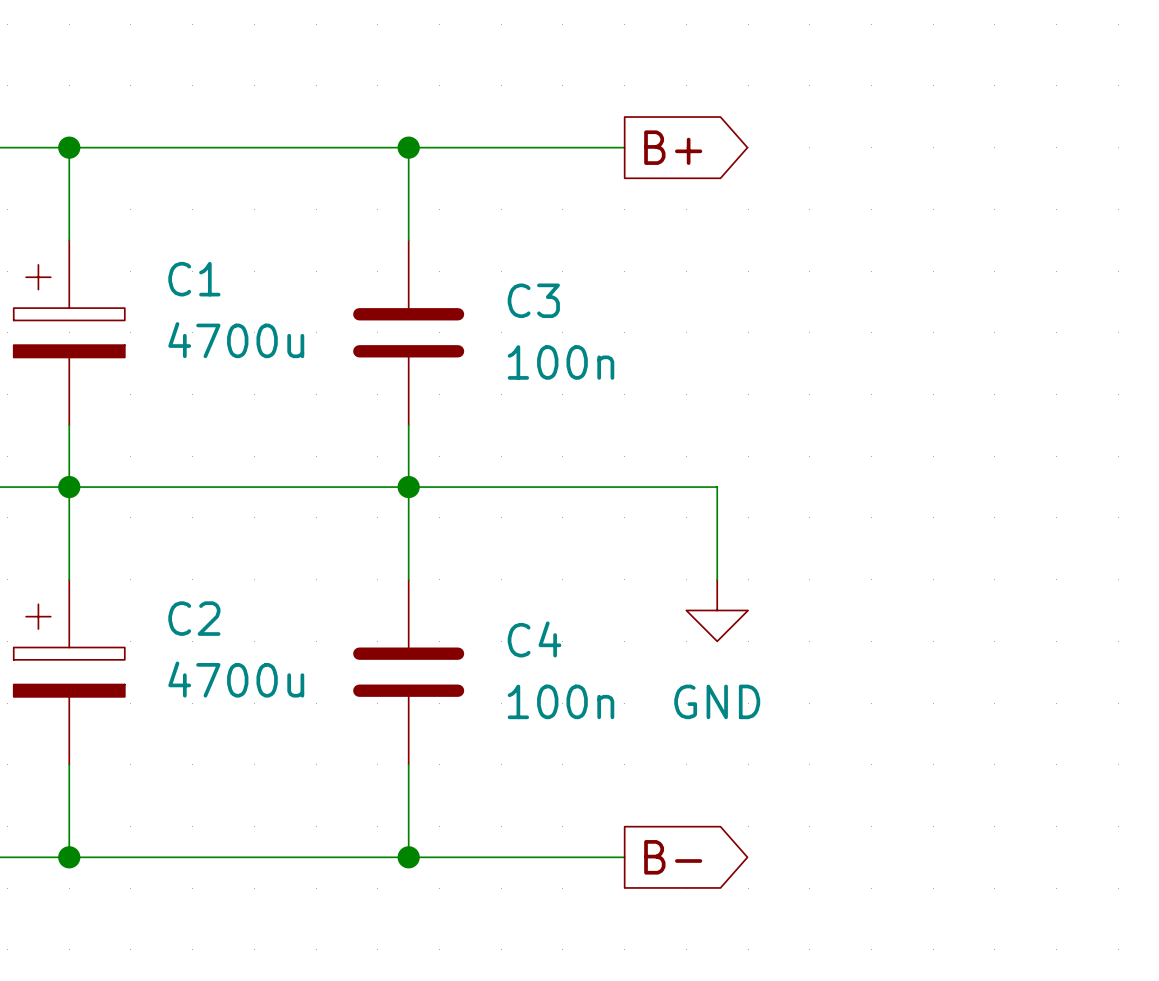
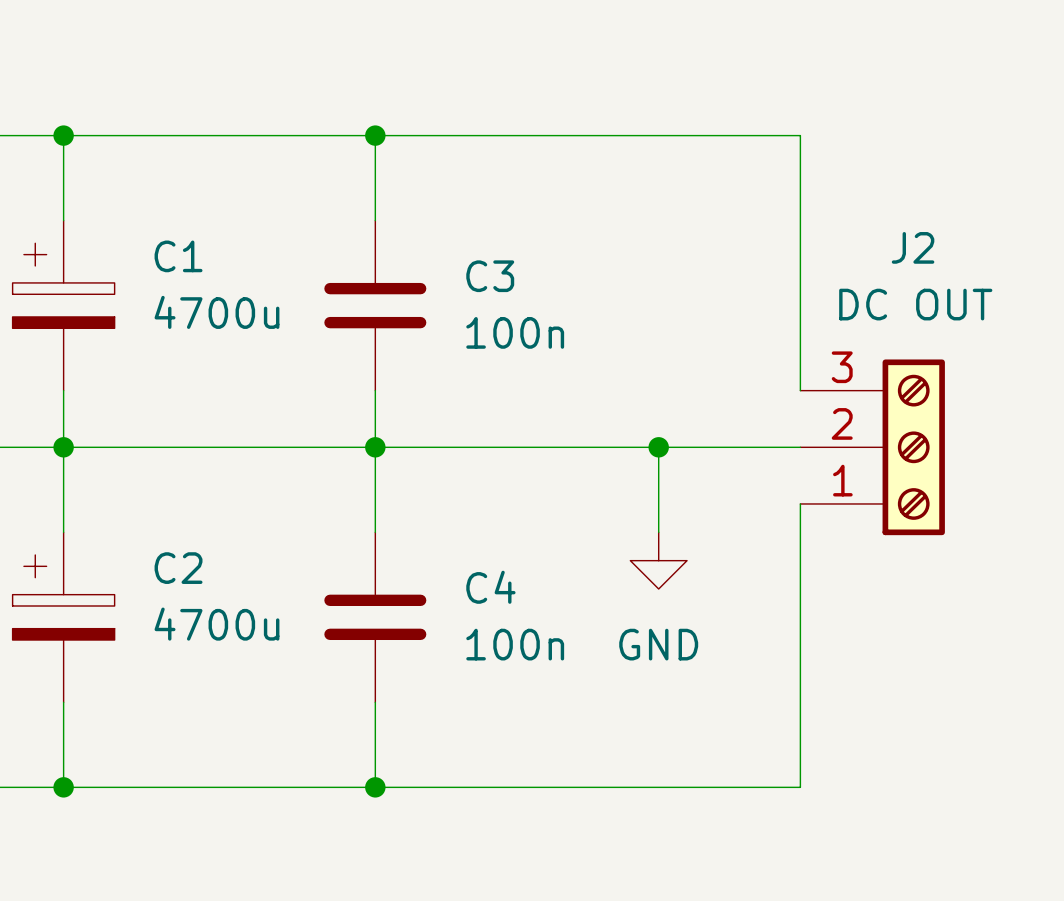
wire: none -> (573, 135) (800, 135) (800, 390)
global label: B+ (673, 147) -> none
wire: none -> (658, 447) (800, 447)
junction: none -> (658, 447)
J2: none -> DC OUT (872, 447)
wire: none -> (800, 503) (800, 787) (573, 787)
global label: B- (673, 857) -> none

